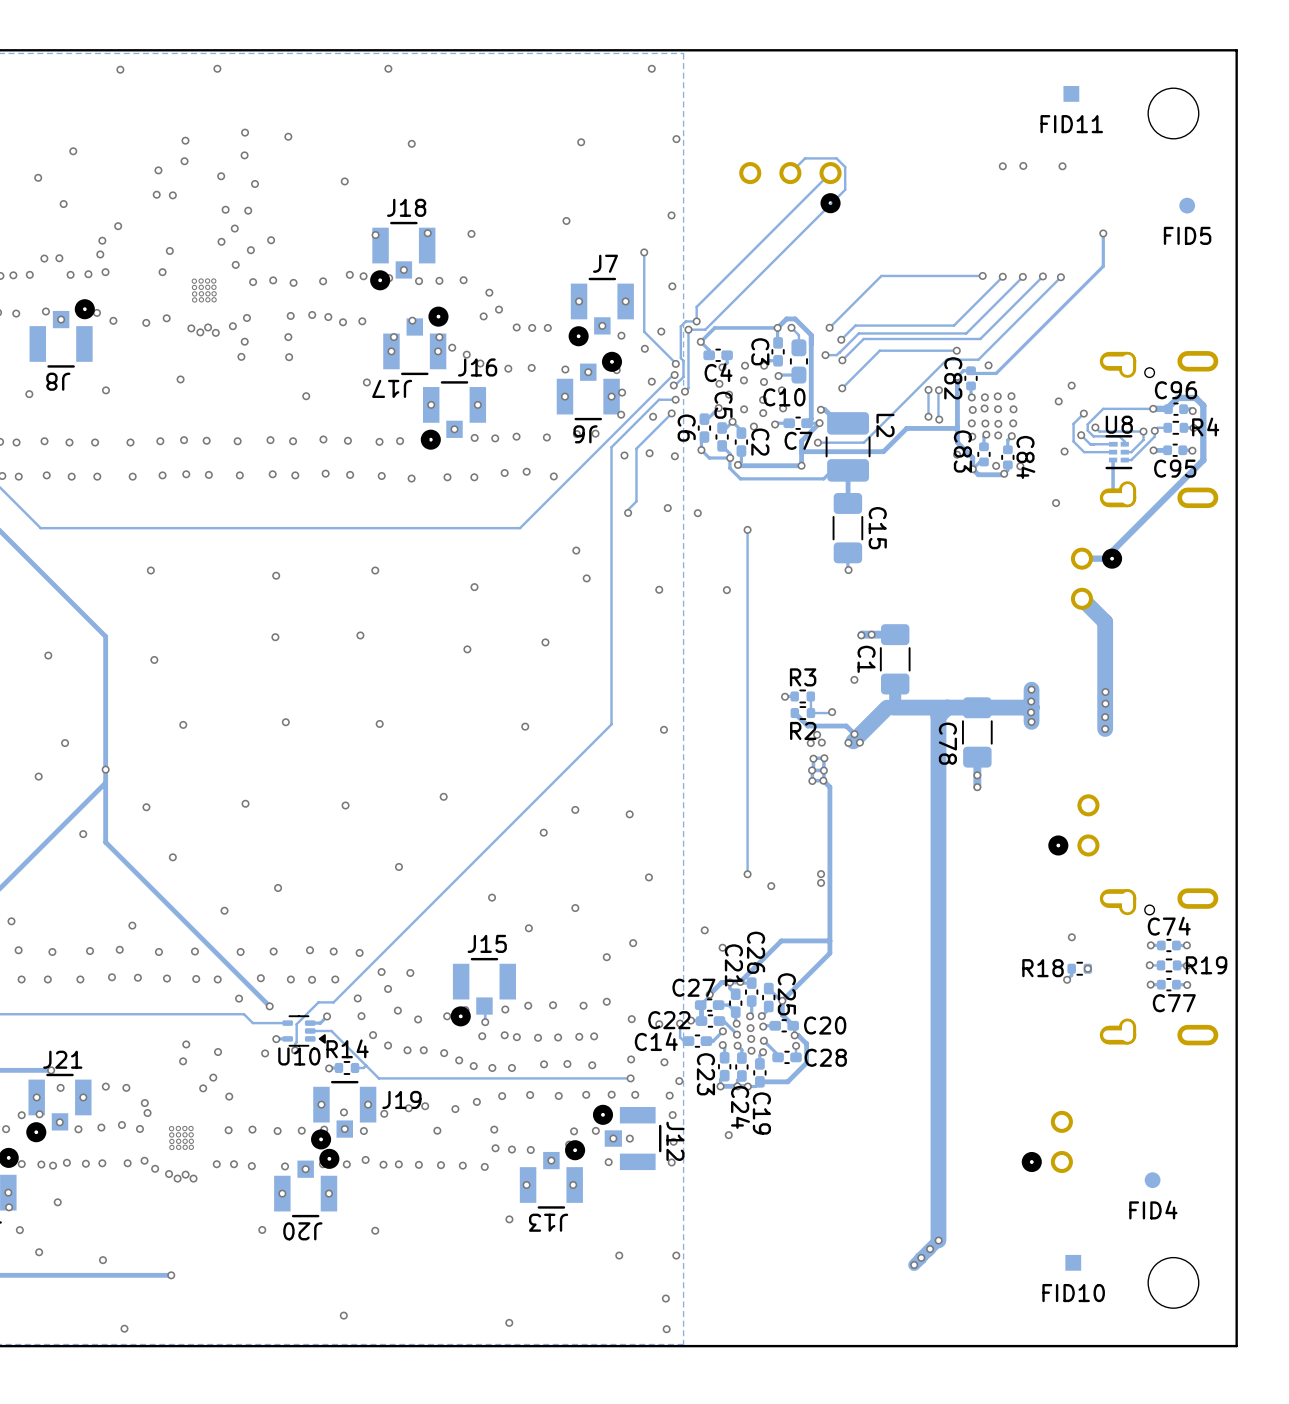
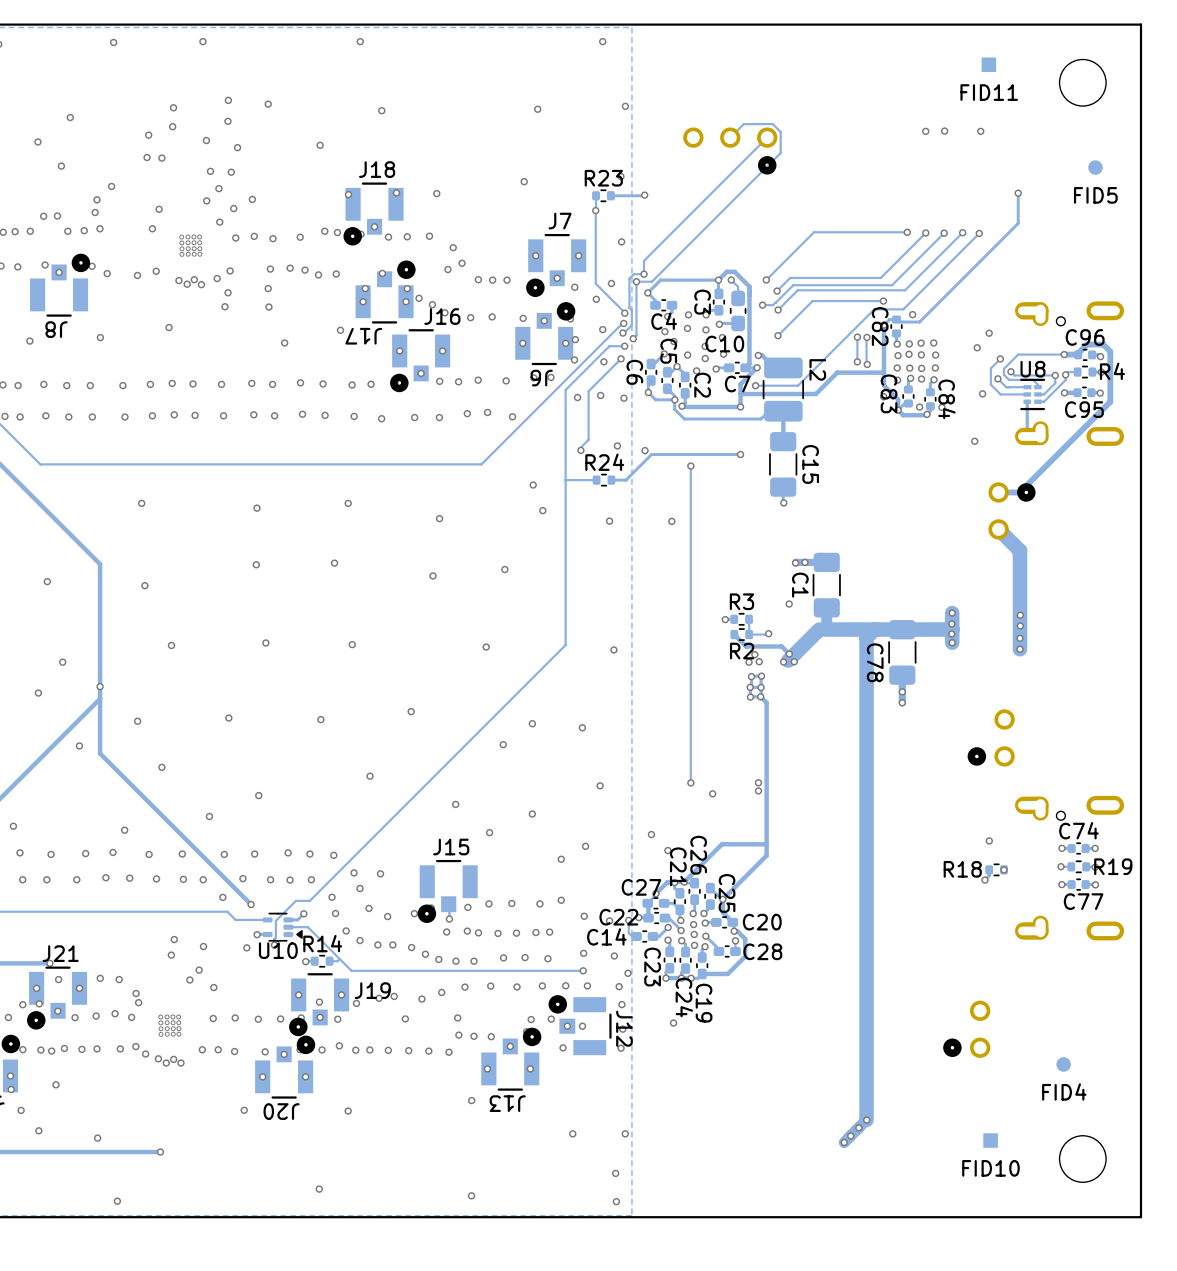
track: none -> (644, 195) (610, 195)
via: none -> (644, 195)
track: none -> (596, 195) (595, 210)
R23: none -> (603, 195)
track: none -> (740, 454) (651, 454) (625, 480) (611, 480)
via: none -> (740, 454)
track: none -> (596, 480) (565, 480)
R24: none -> (604, 480)

